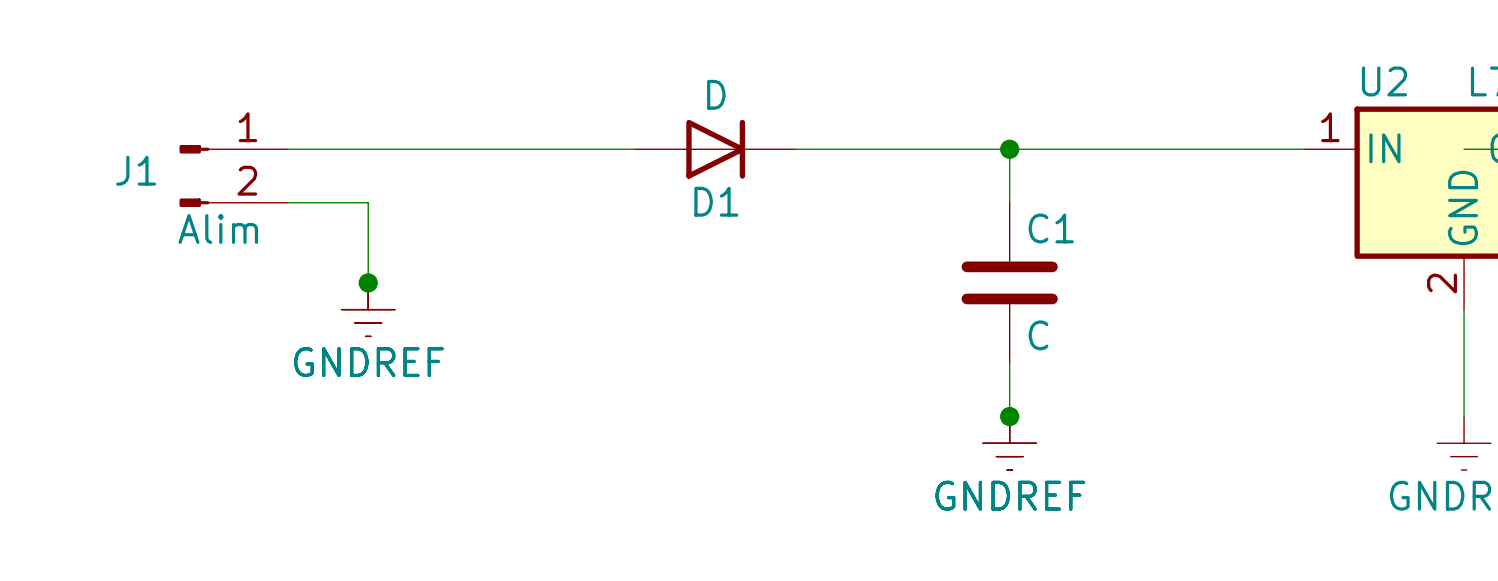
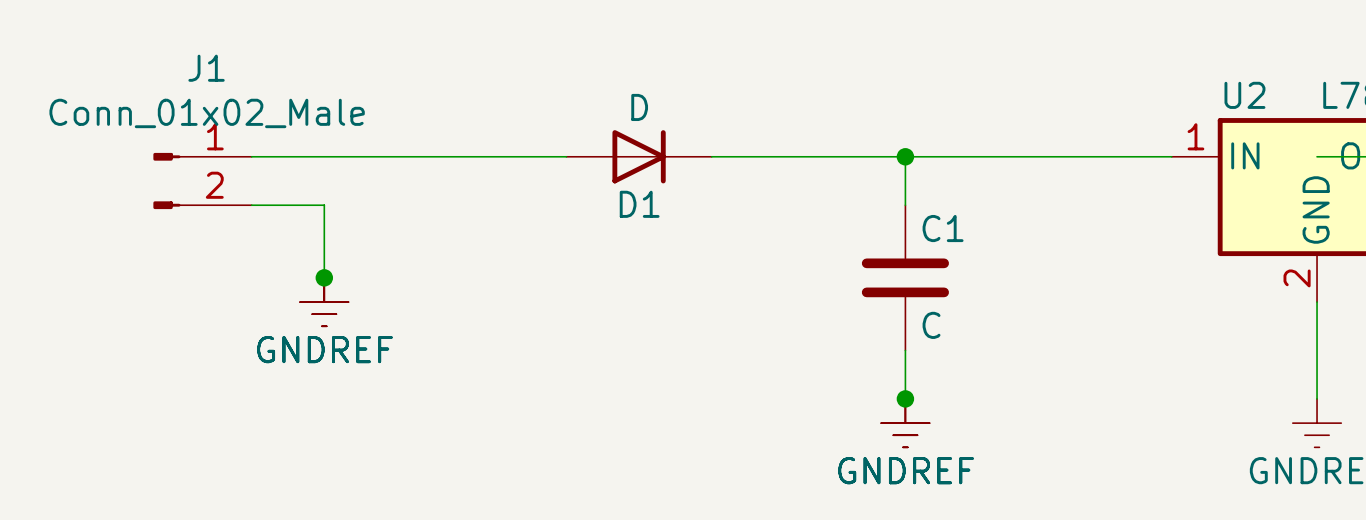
J1 name position: J1 (136, 170) -> J1 (206, 68)
J1 value: Alim (218, 228) -> Conn_01x02_Male (207, 113)

